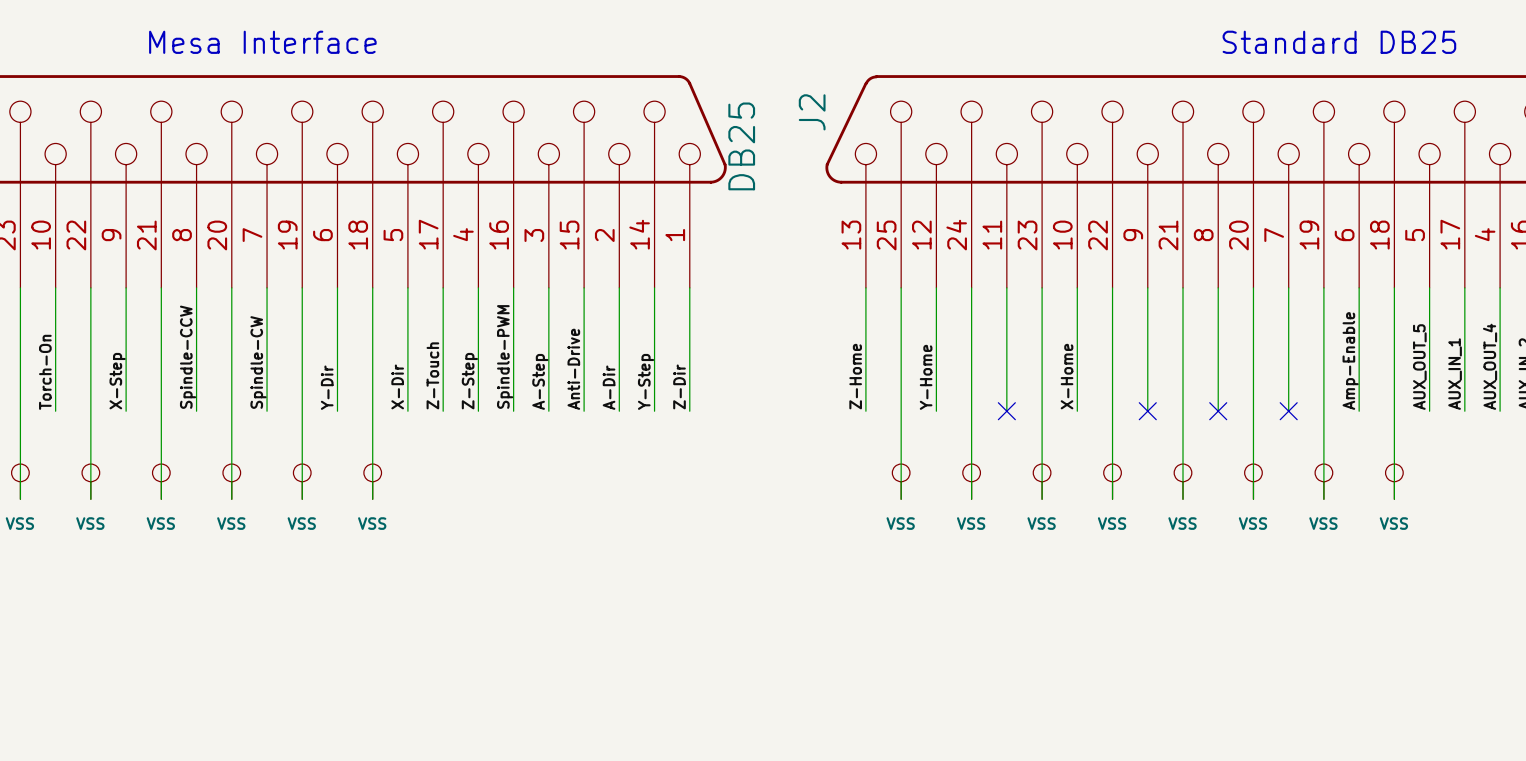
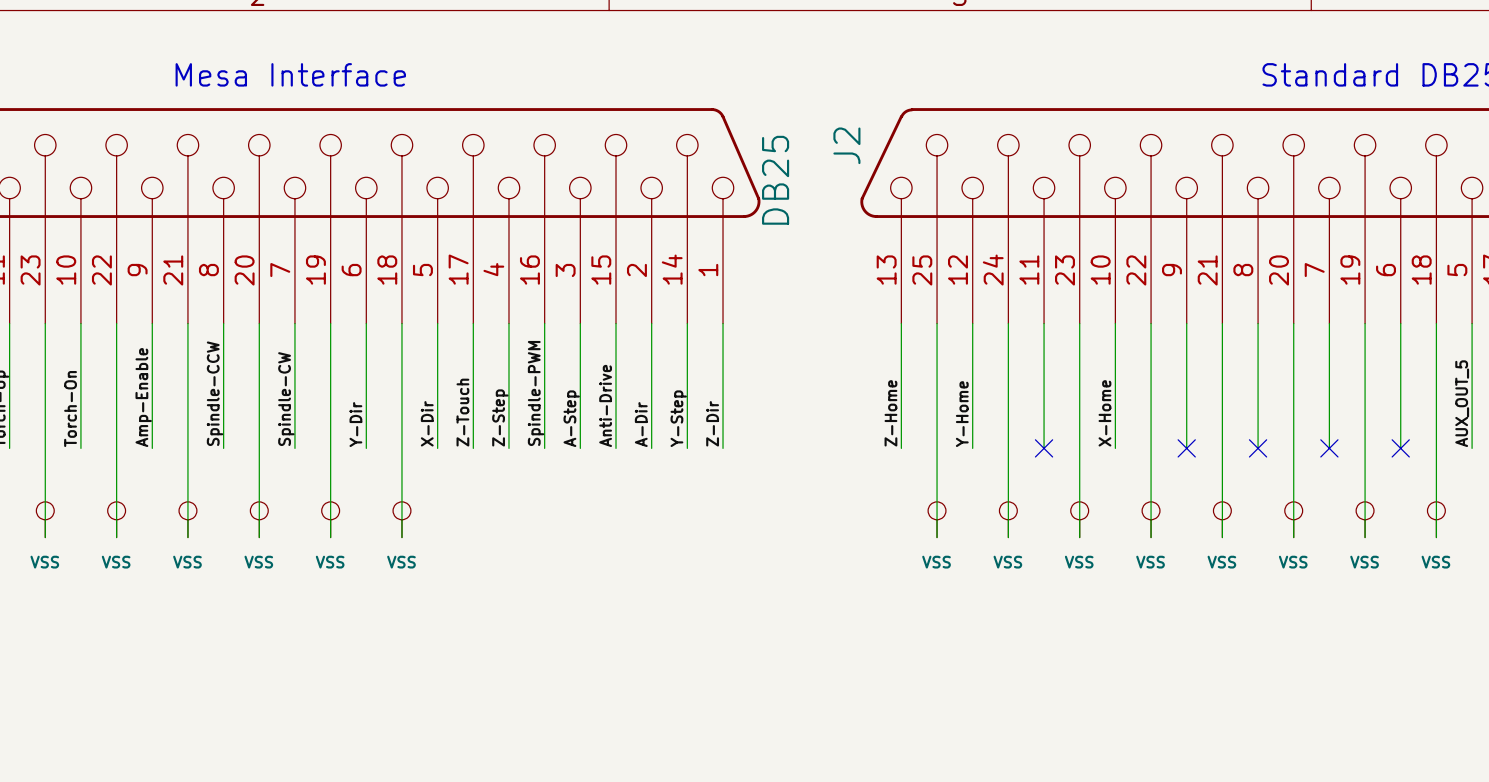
label: Amp-Enable (1350, 361) -> none
label: X-Step (117, 381) -> Amp-Enable (143, 397)
no-connect mark: none -> (1400, 448)

